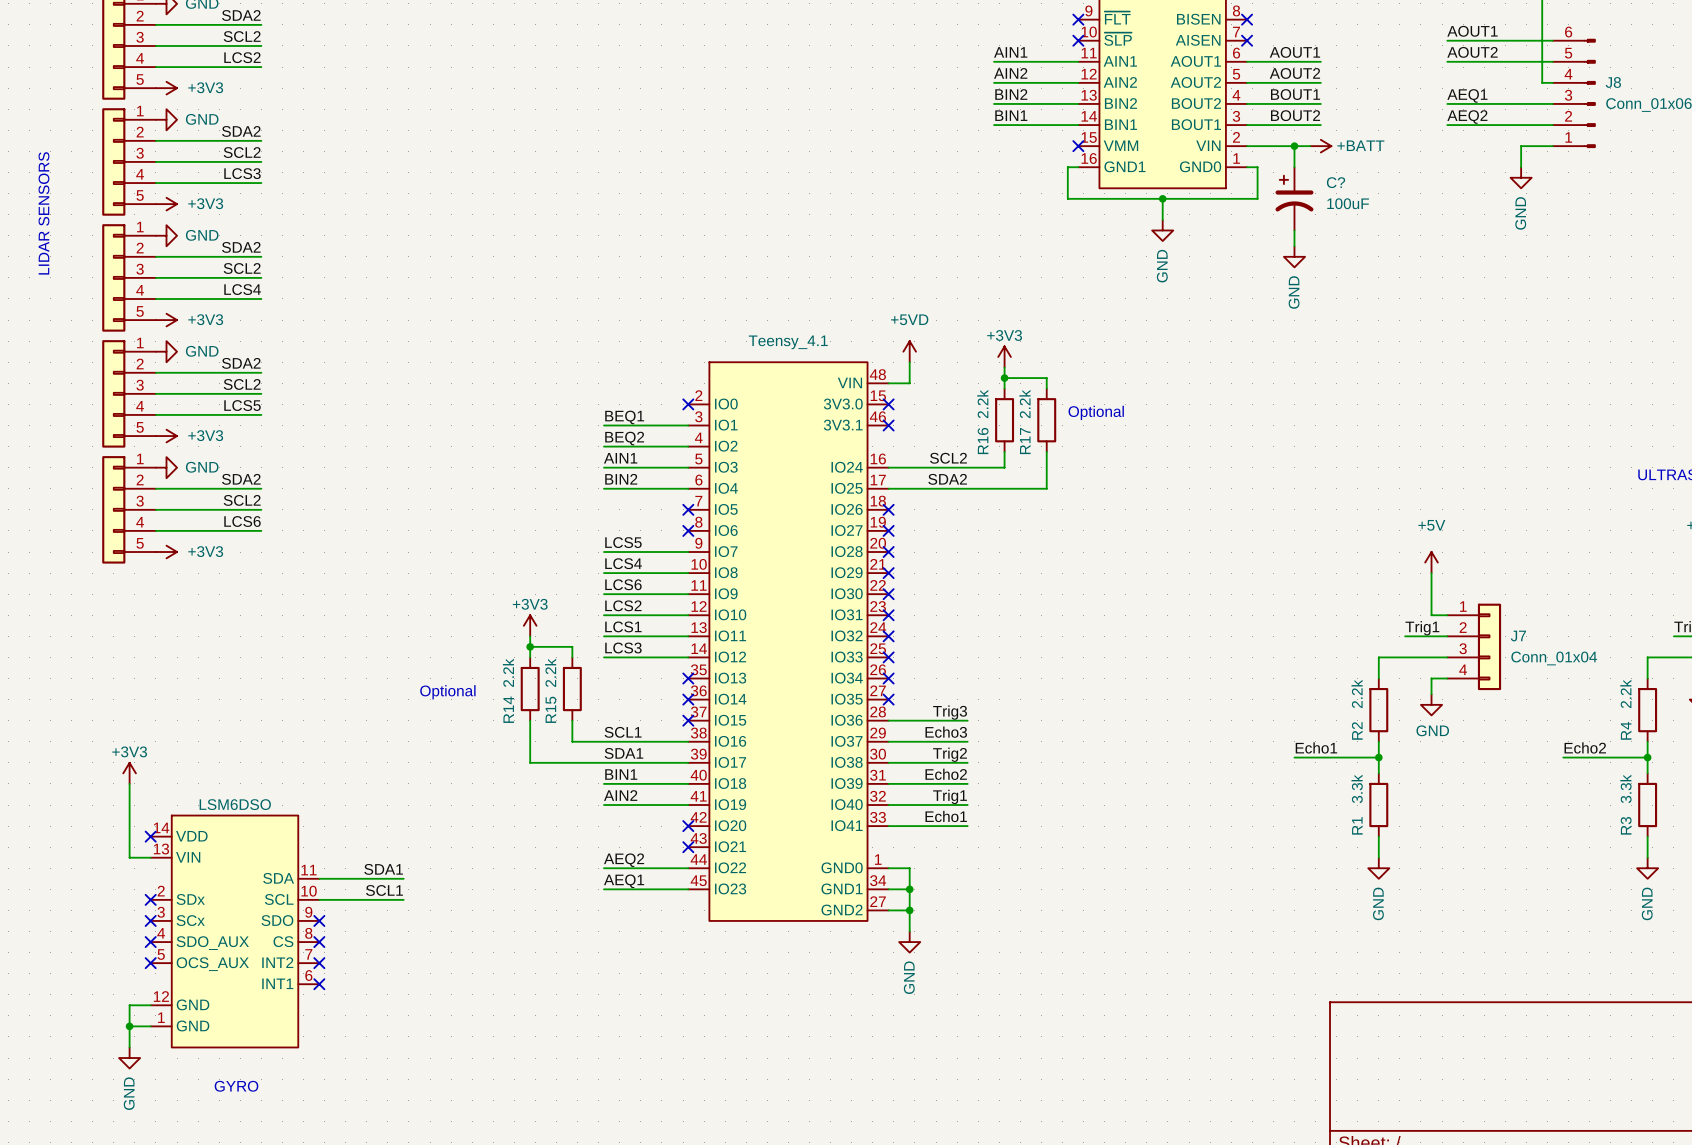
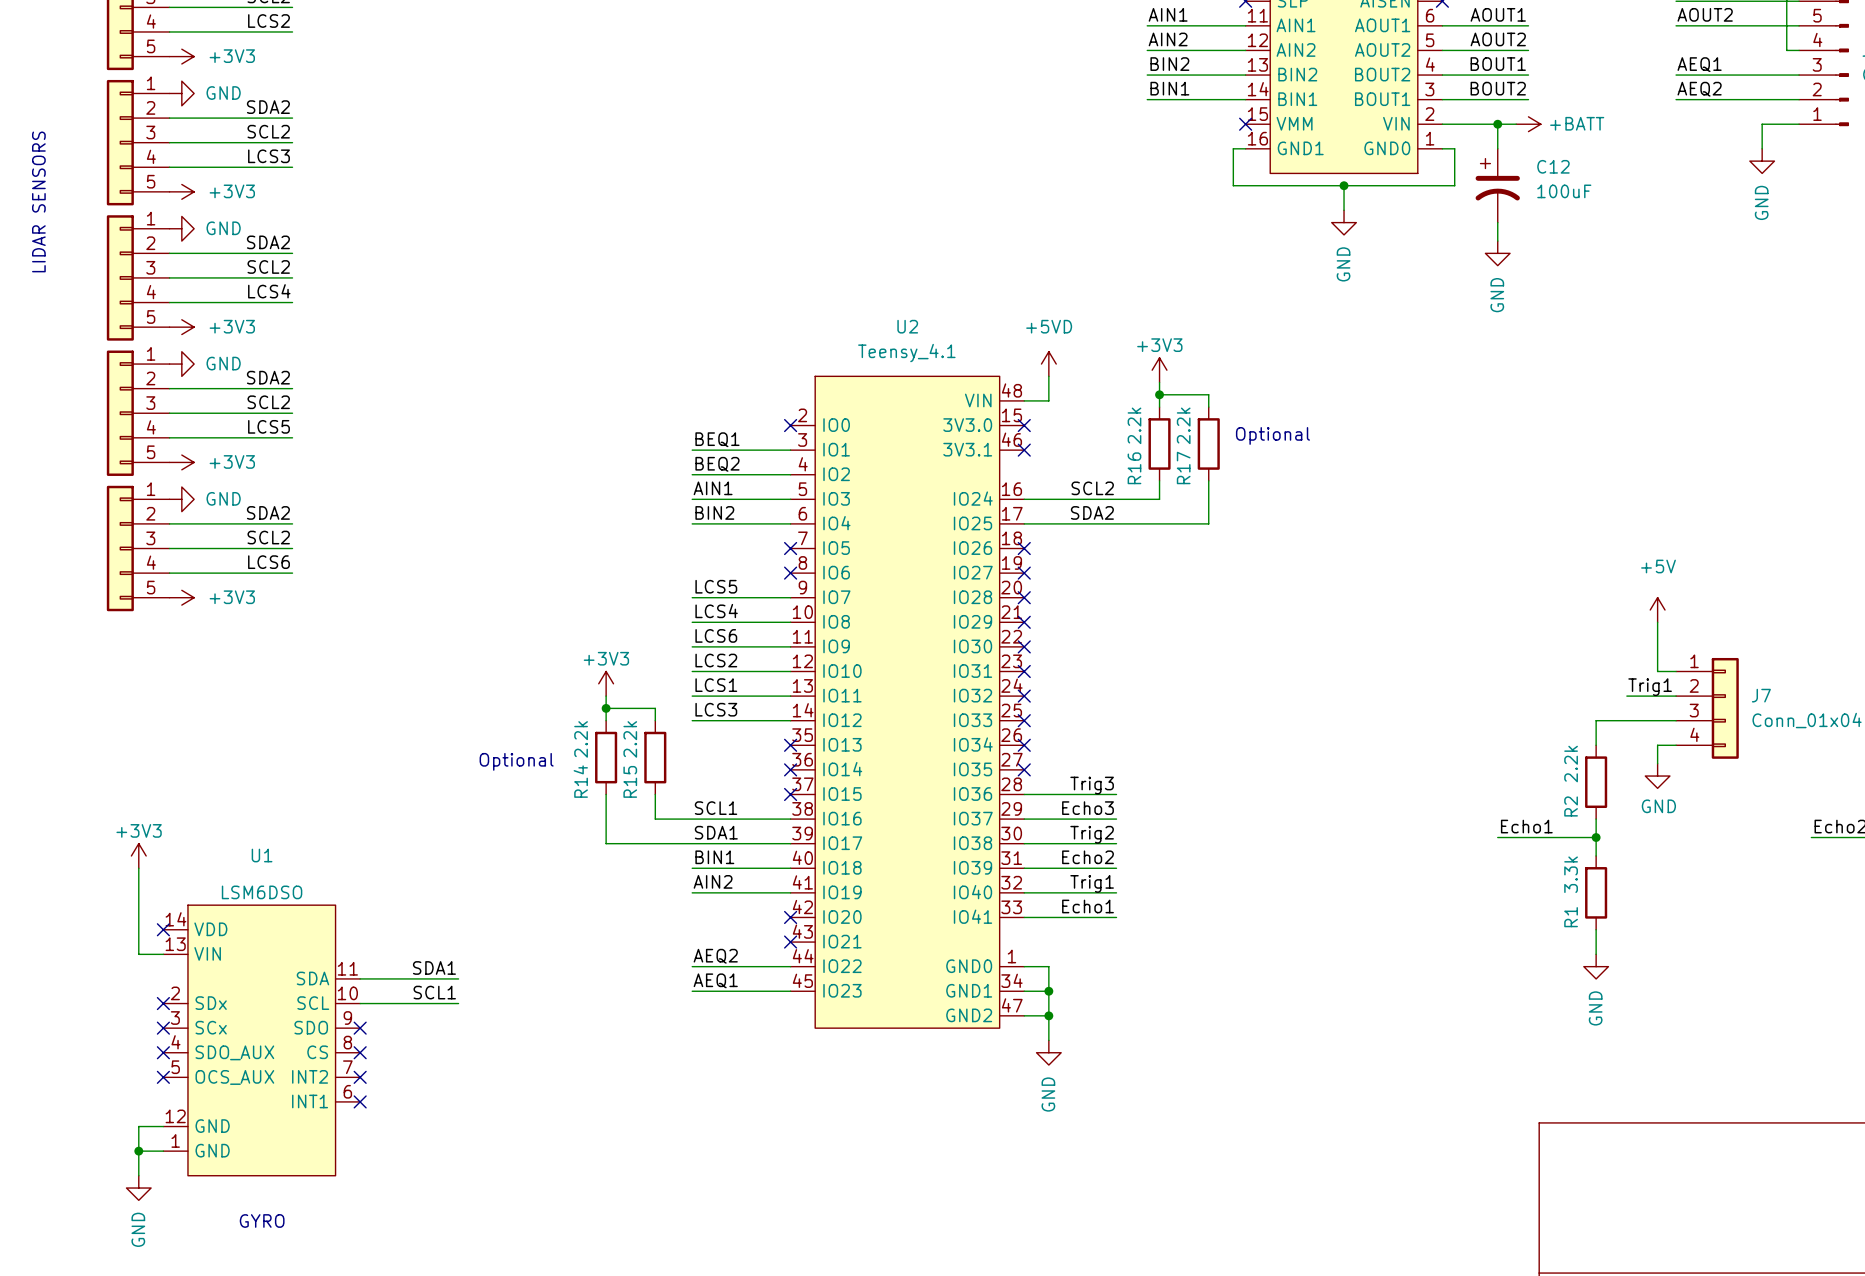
C? name: C? (1336, 182) -> C12 (1553, 166)
U2 name: none -> U2 (907, 326)
U1 name: none -> U1 (262, 855)
U2 pin number: 27 (878, 901) -> 47 (1012, 1005)

